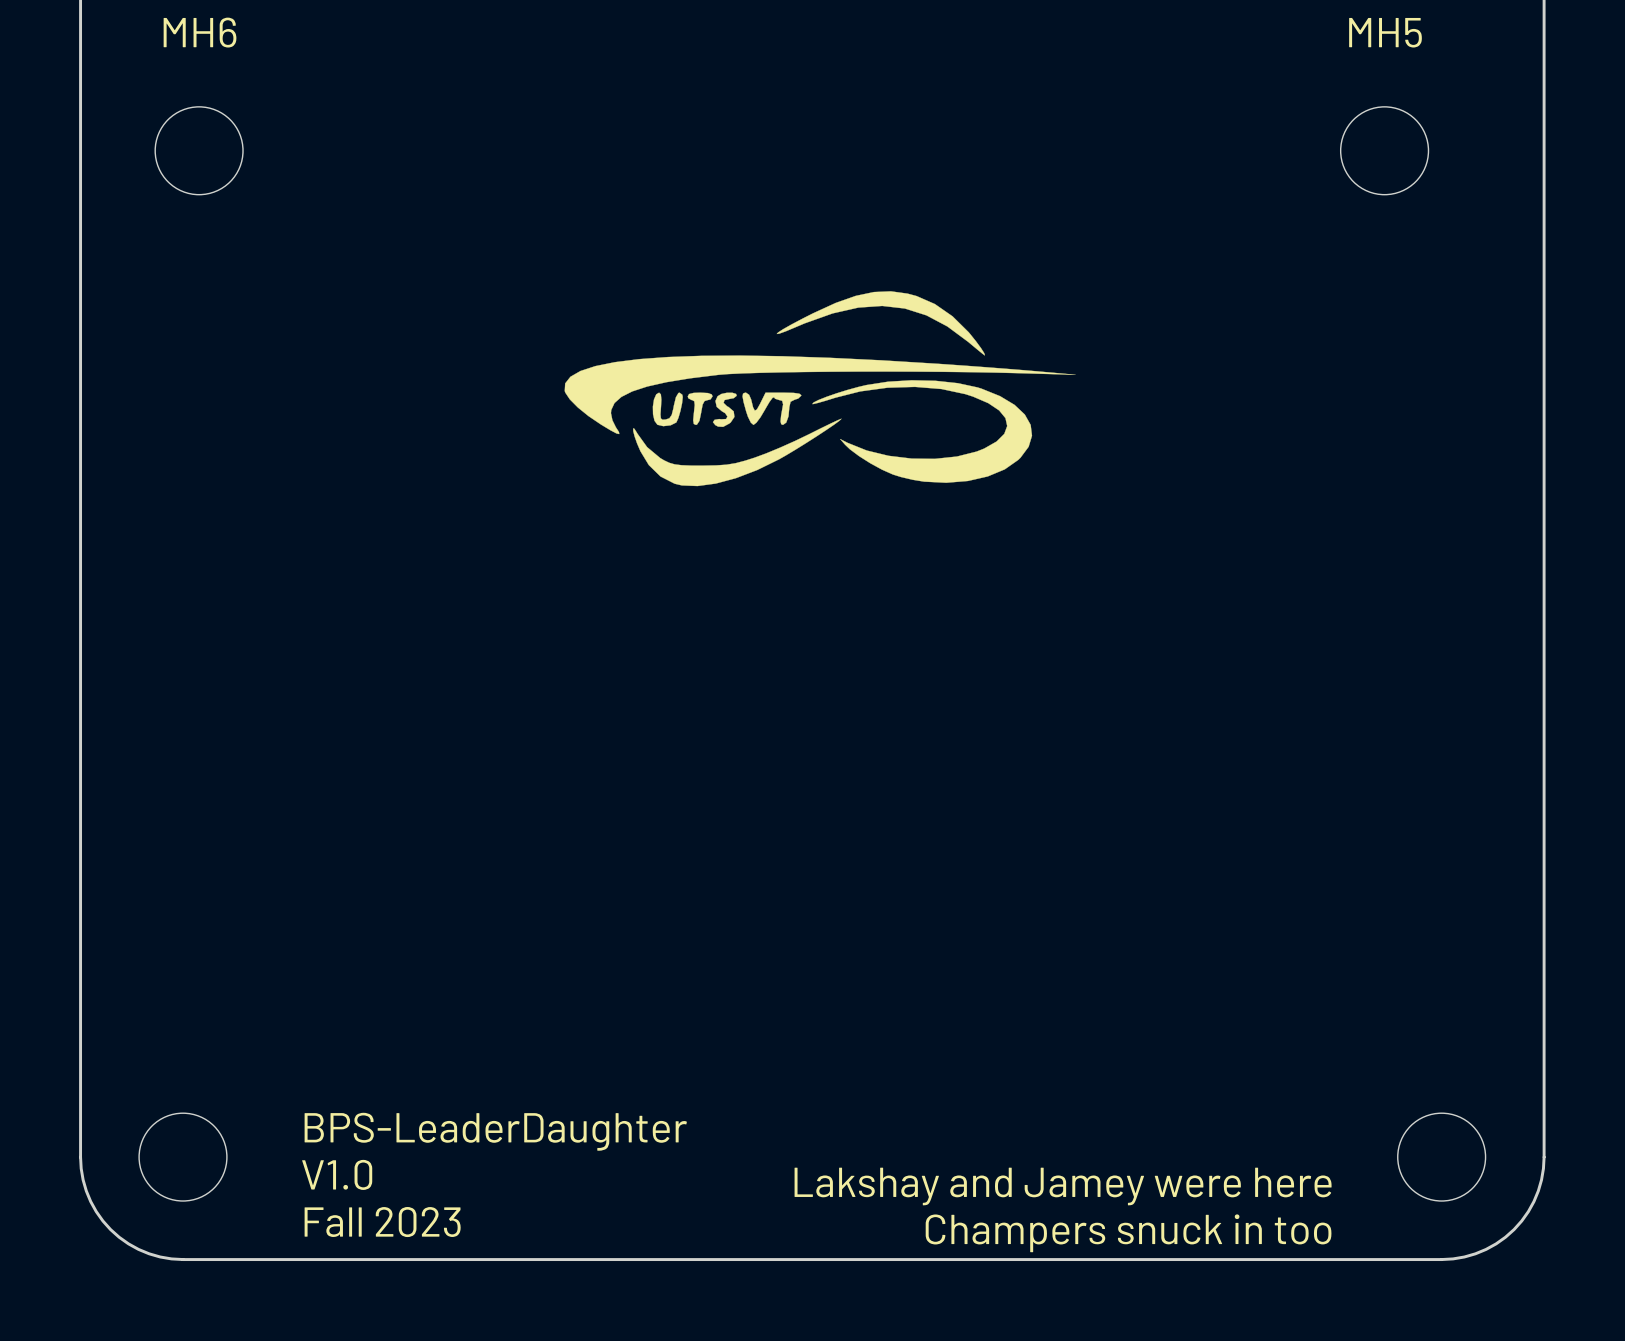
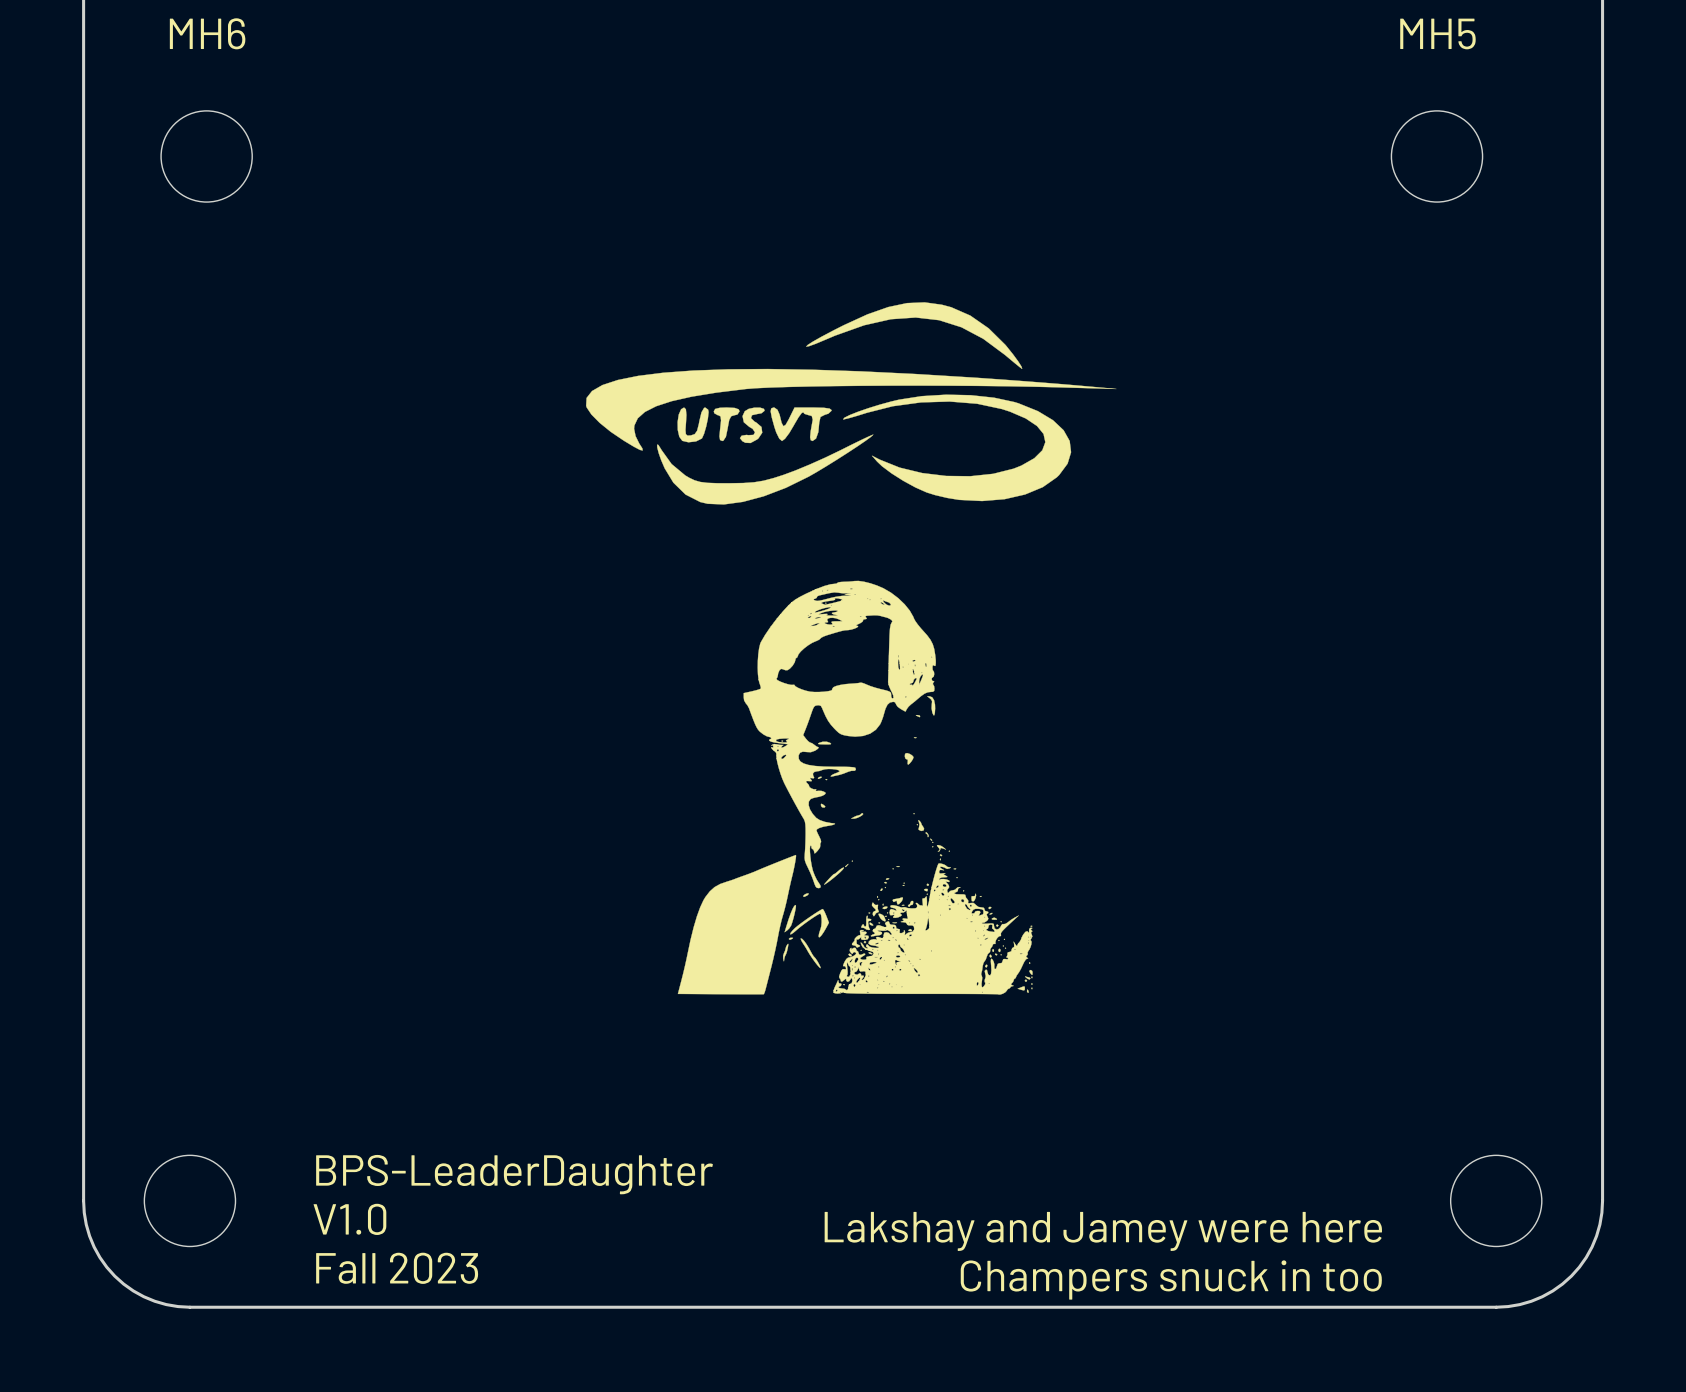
drawing: none -> [677, 580, 1033, 995]

